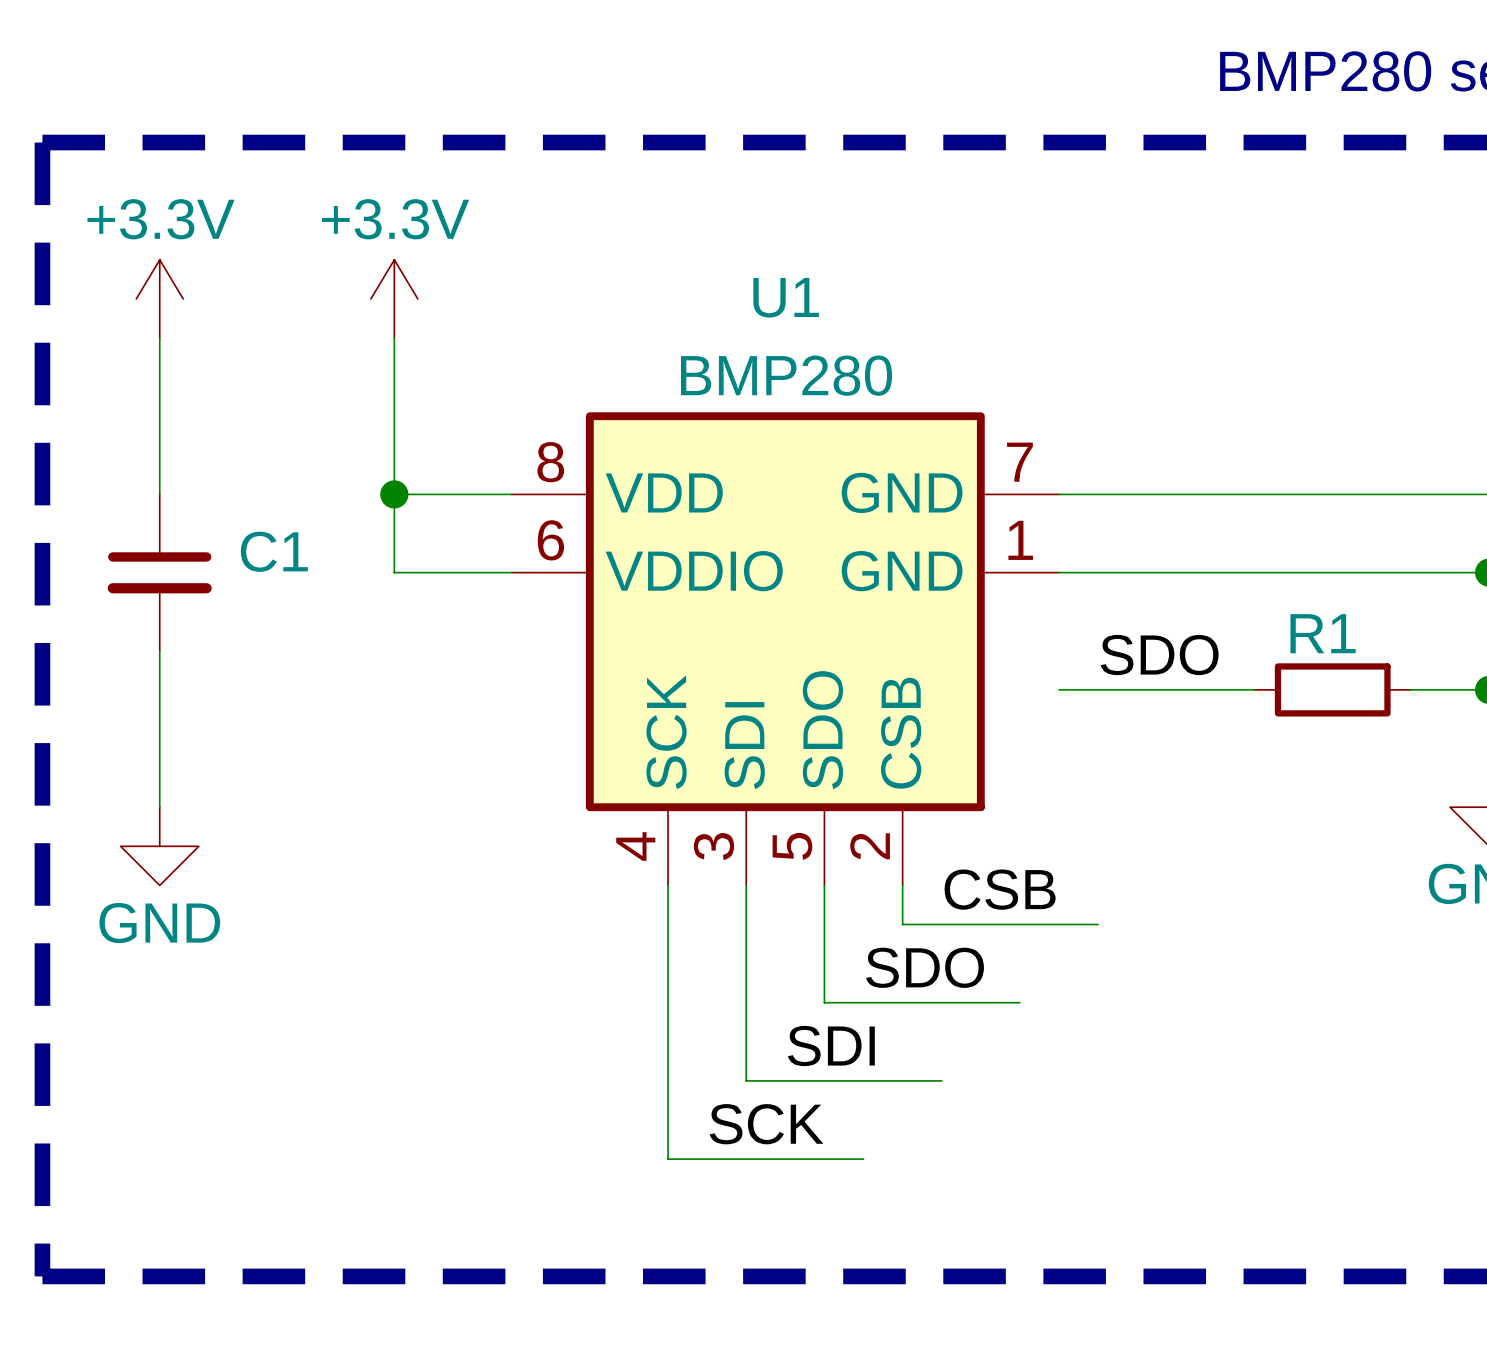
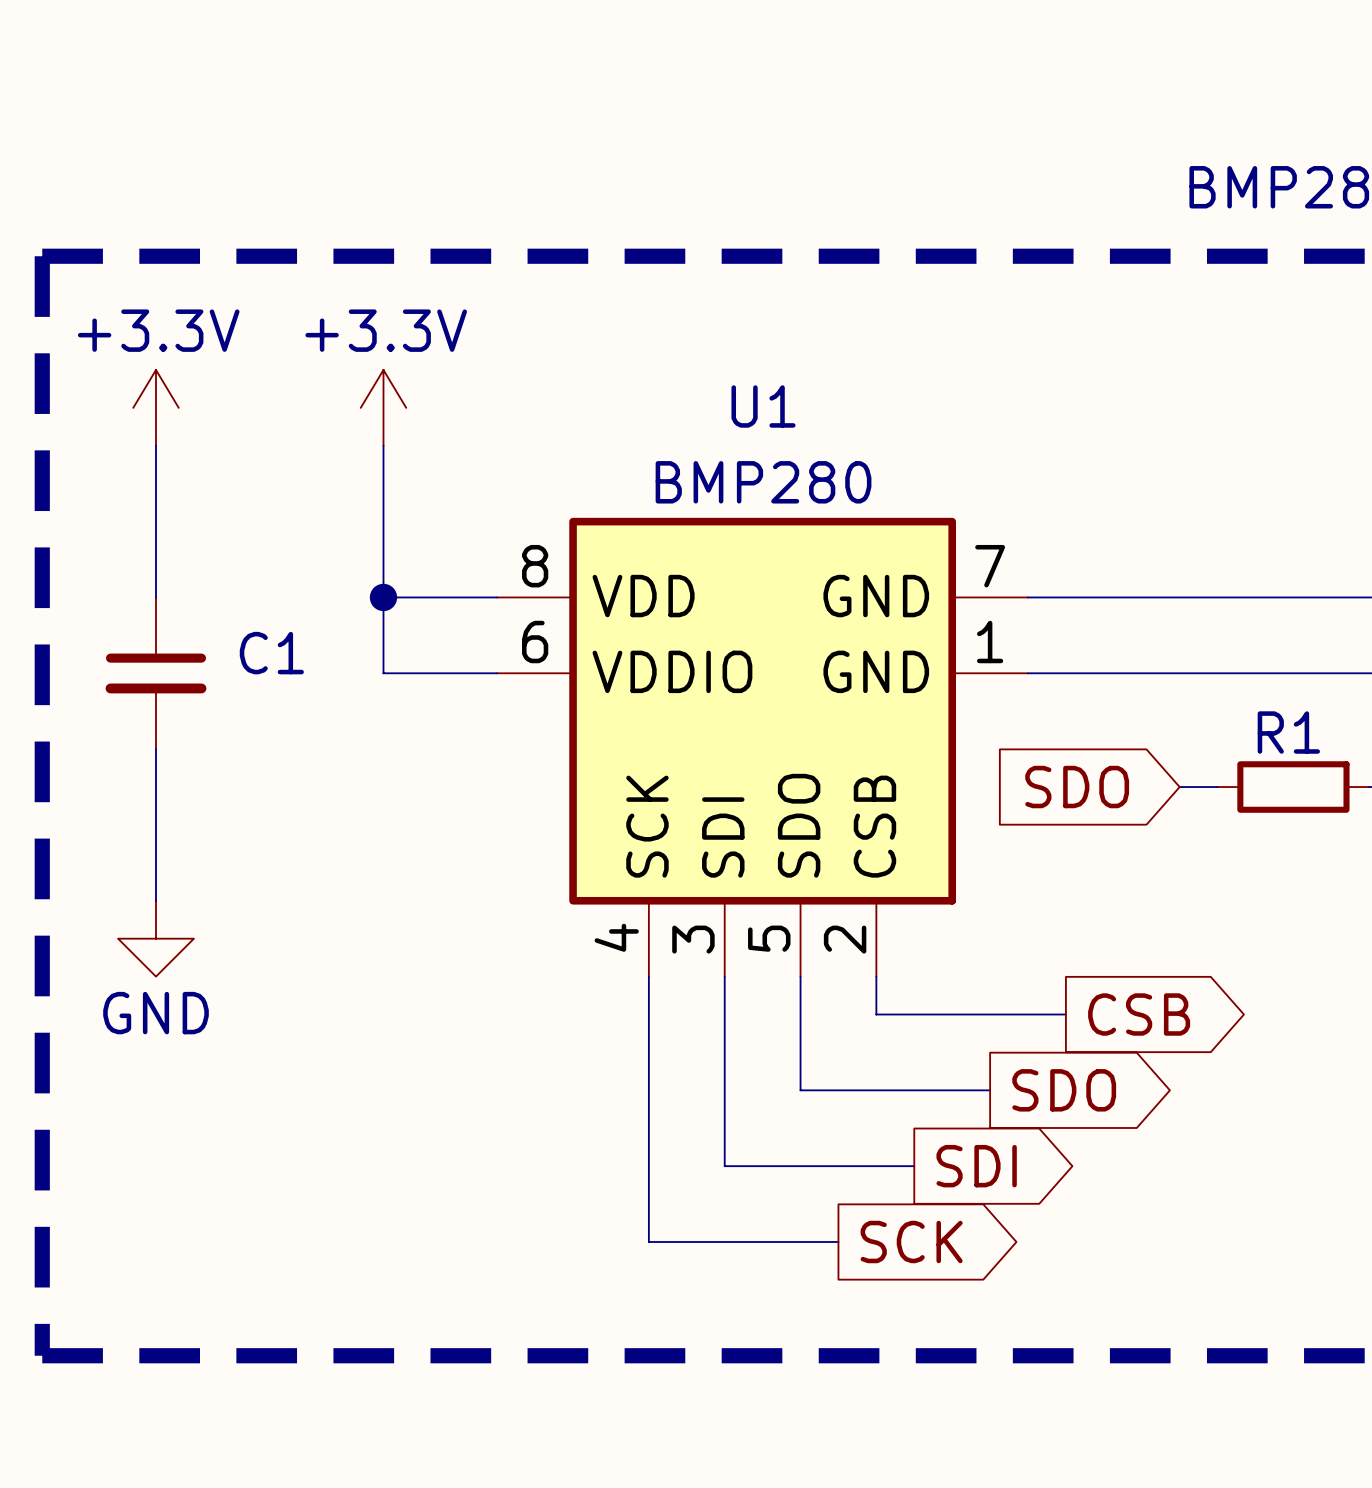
label: SDO (1159, 655) -> none
wire: (1059, 689) (1215, 689) -> none
global label: none -> SDO (1077, 787)
label: CSB (1000, 889) -> none
global label: none -> CSB (1139, 1014)
label: SDO (925, 967) -> none
global label: none -> SDO (1064, 1090)
label: SDI (831, 1046) -> none
global label: none -> SDI (976, 1166)
label: SCK (766, 1124) -> none
global label: none -> SCK (911, 1241)

